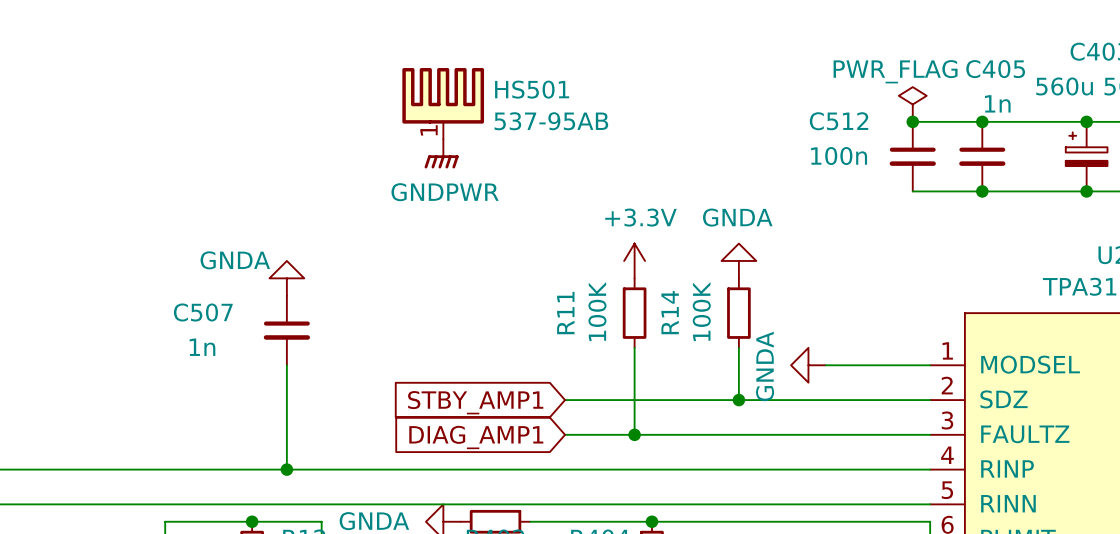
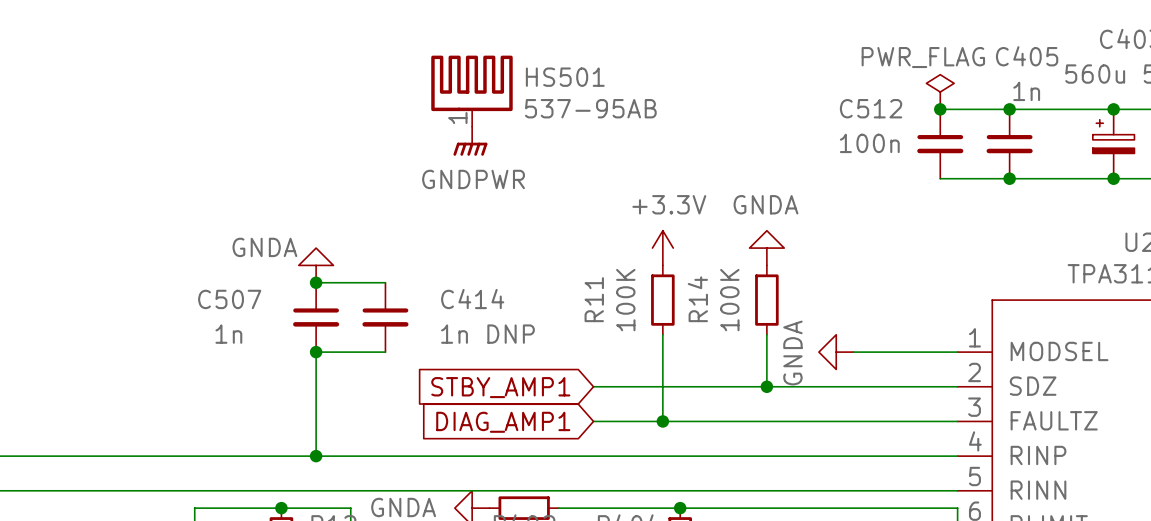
wire: none -> (316, 282) (385, 282)
junction: none -> (316, 282)
C414: none -> 1n DNP (385, 317)
wire: none -> (316, 352) (385, 352)
junction: none -> (316, 352)

